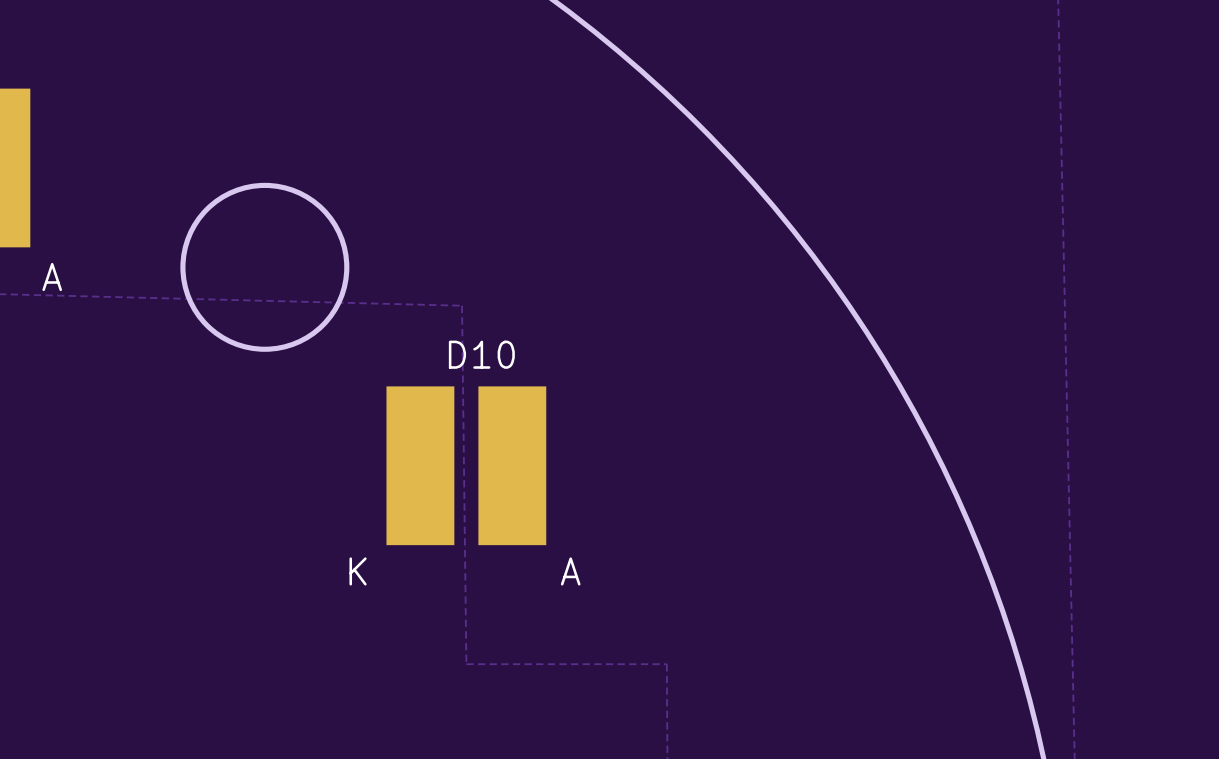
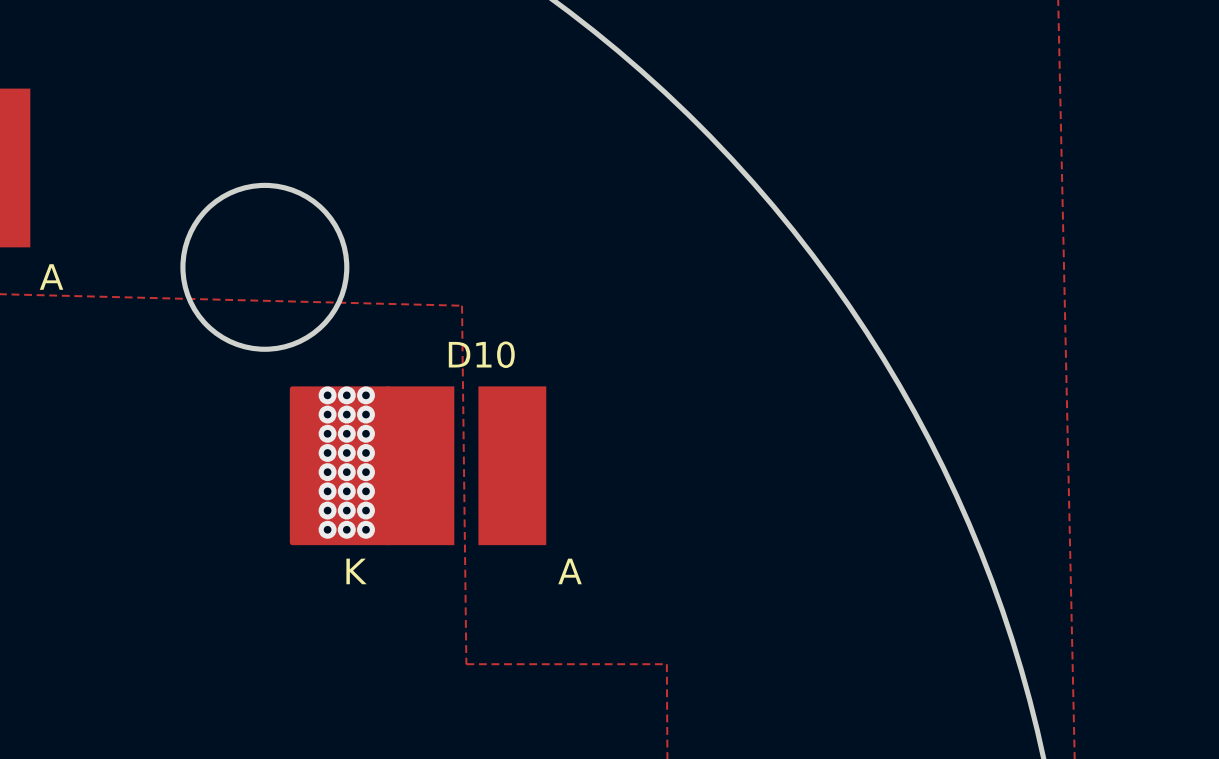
drawing: none -> [289, 386, 391, 546]
via: none -> (327, 395)
via: none -> (346, 395)
via: none -> (366, 395)
via: none -> (327, 414)
via: none -> (346, 414)
via: none -> (366, 414)
via: none -> (327, 433)
via: none -> (346, 433)
via: none -> (366, 433)
via: none -> (327, 452)
via: none -> (346, 452)
via: none -> (366, 452)
via: none -> (327, 472)
via: none -> (346, 472)
via: none -> (366, 472)
via: none -> (327, 491)
via: none -> (346, 491)
via: none -> (366, 491)
via: none -> (327, 510)
via: none -> (346, 510)
via: none -> (366, 510)
via: none -> (327, 529)
via: none -> (346, 529)
via: none -> (366, 529)

